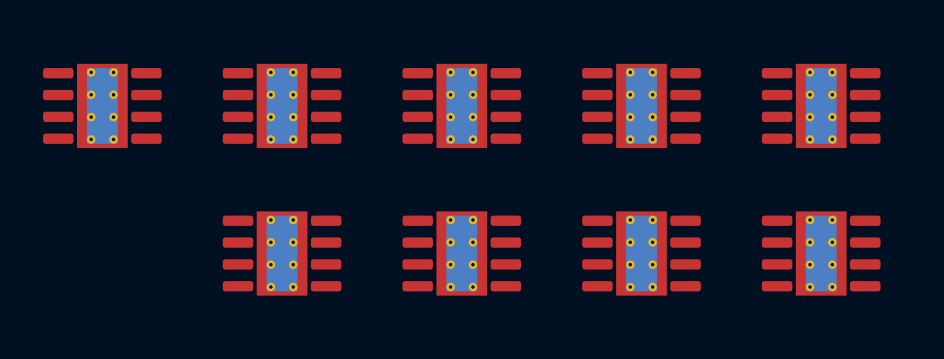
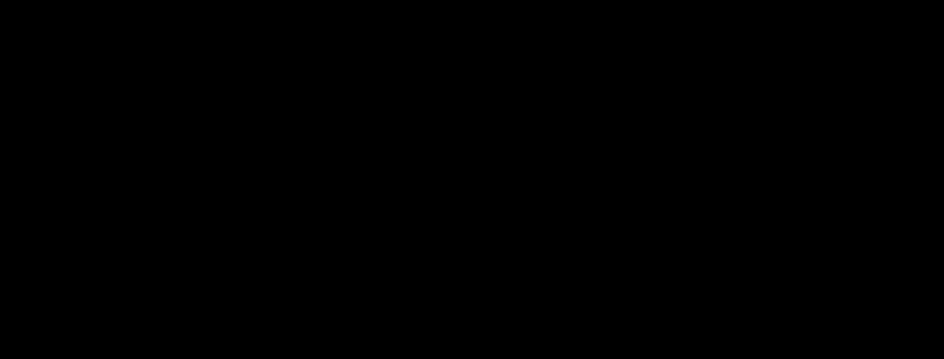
part: (102, 105) -> none
part: (282, 105) -> none
part: (461, 105) -> none
part: (641, 105) -> none
part: (821, 105) -> none
part: (282, 253) -> none
part: (461, 253) -> none
part: (641, 253) -> none
part: (821, 253) -> none

